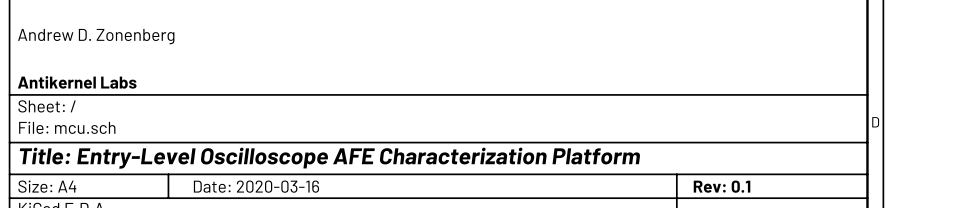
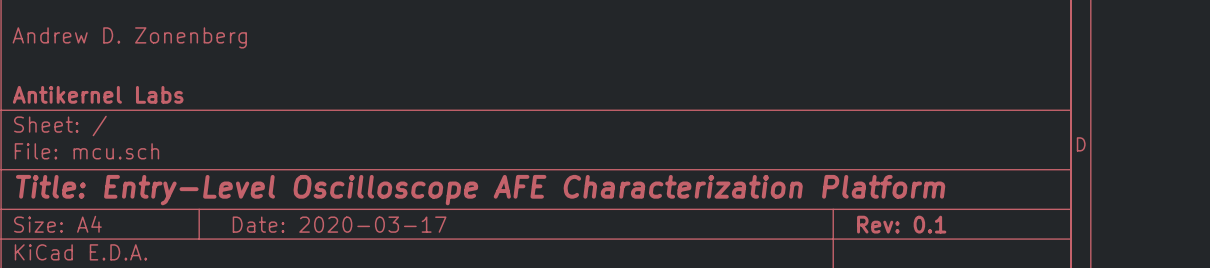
title block: Date: 2020-03-16 (256, 186) -> Date: 2020-03-17 (339, 224)

